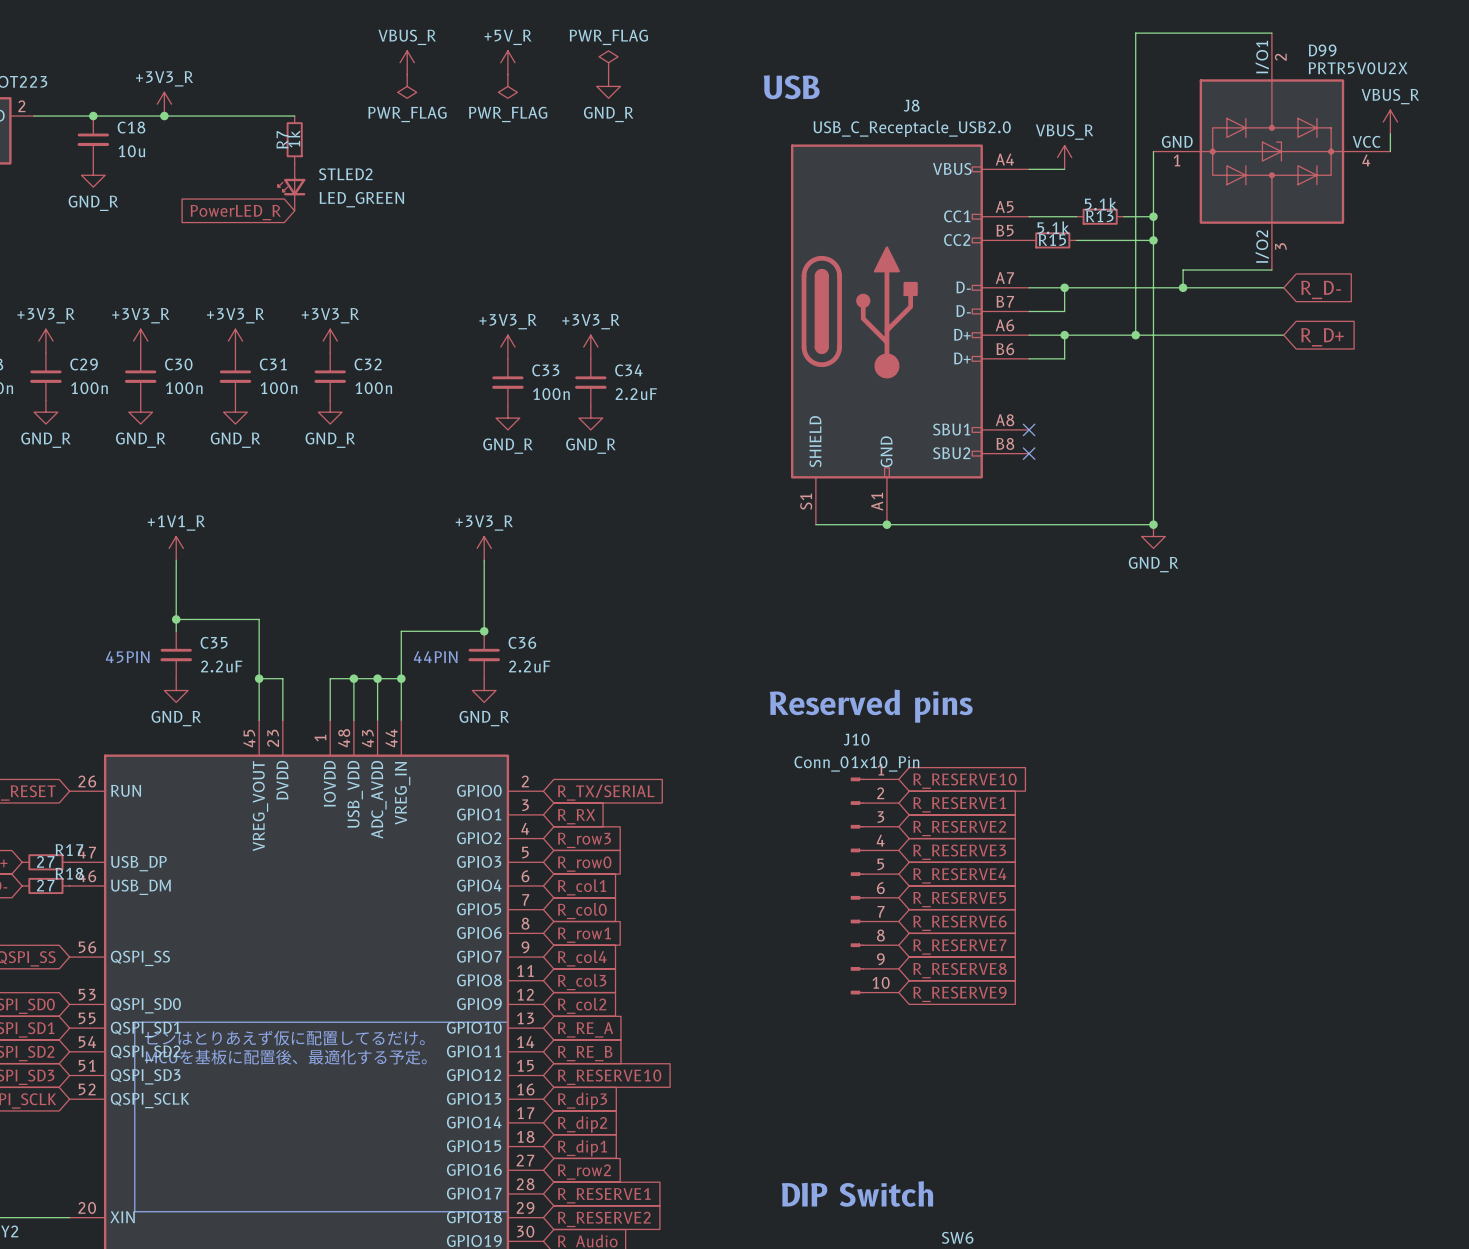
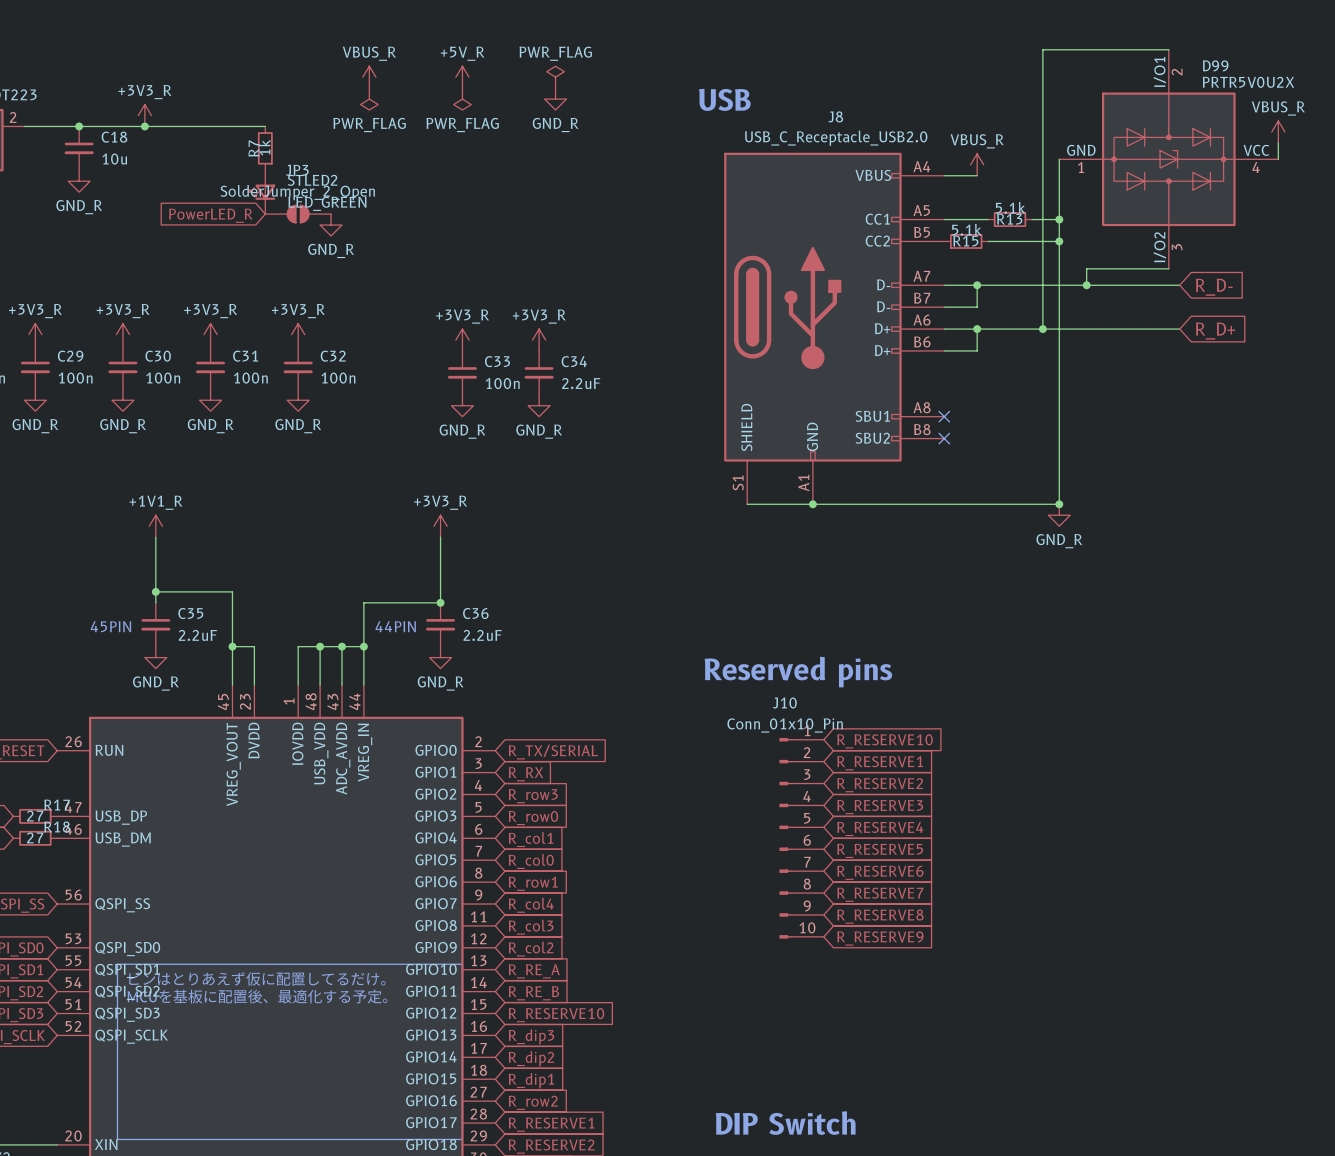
JP3: none -> SolderJumper_2_Open (298, 214)
power symbol: none -> GND_R (331, 225)

